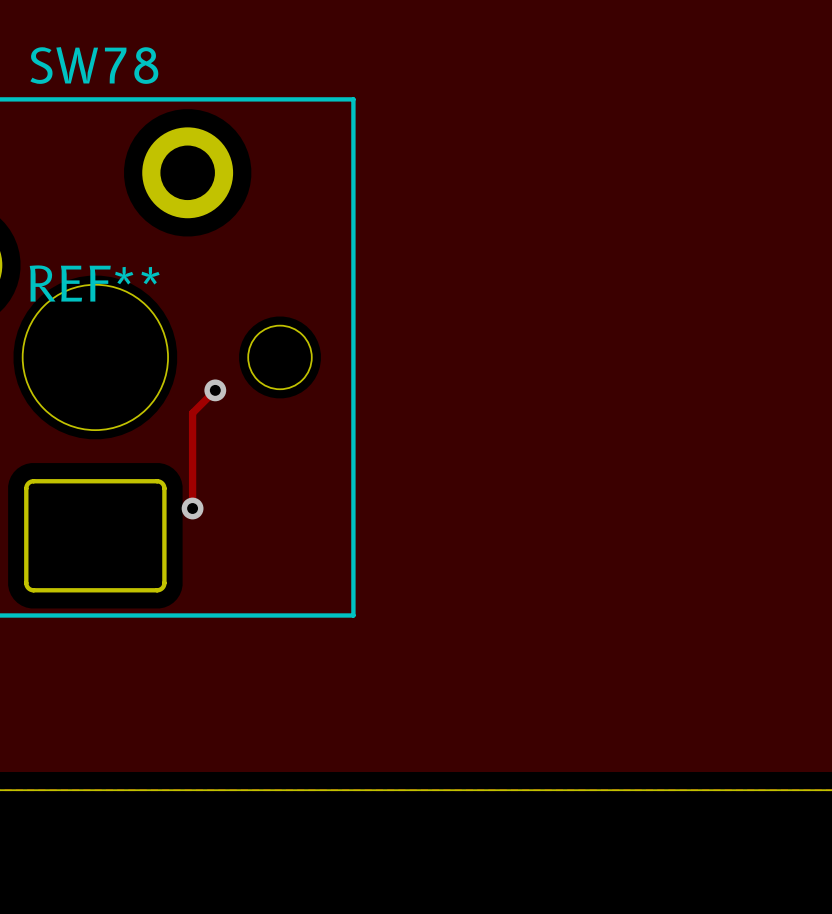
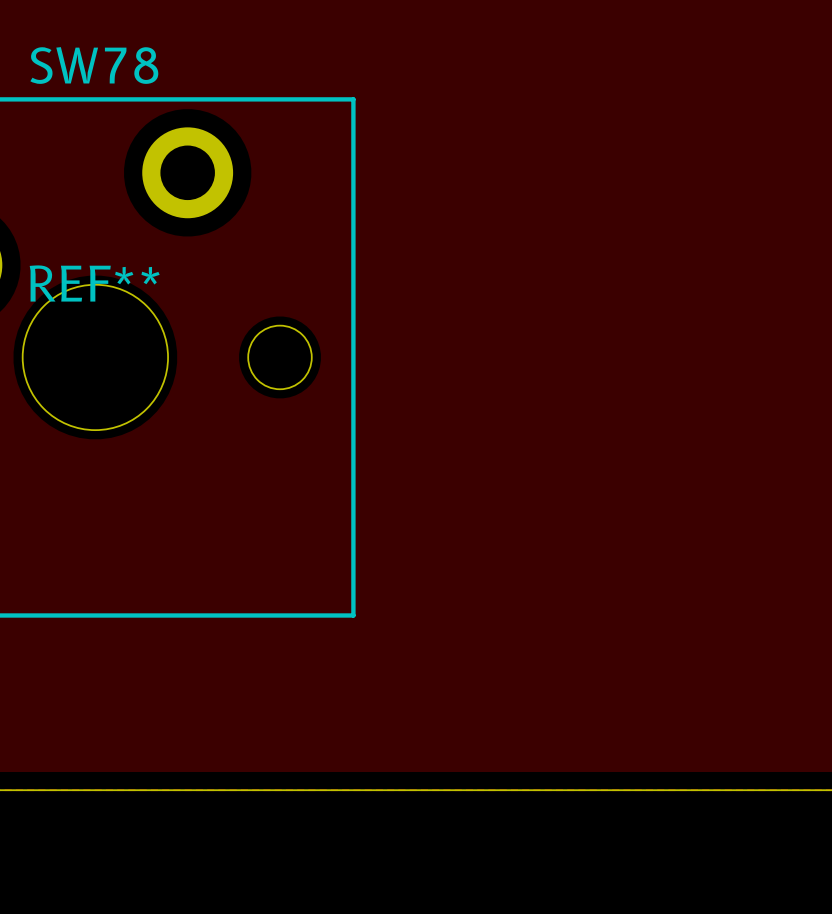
track: (215, 390) (192, 413) (192, 508) -> none
via: (215, 390) -> none
via: (192, 508) -> none
part: (95, 535) -> none

